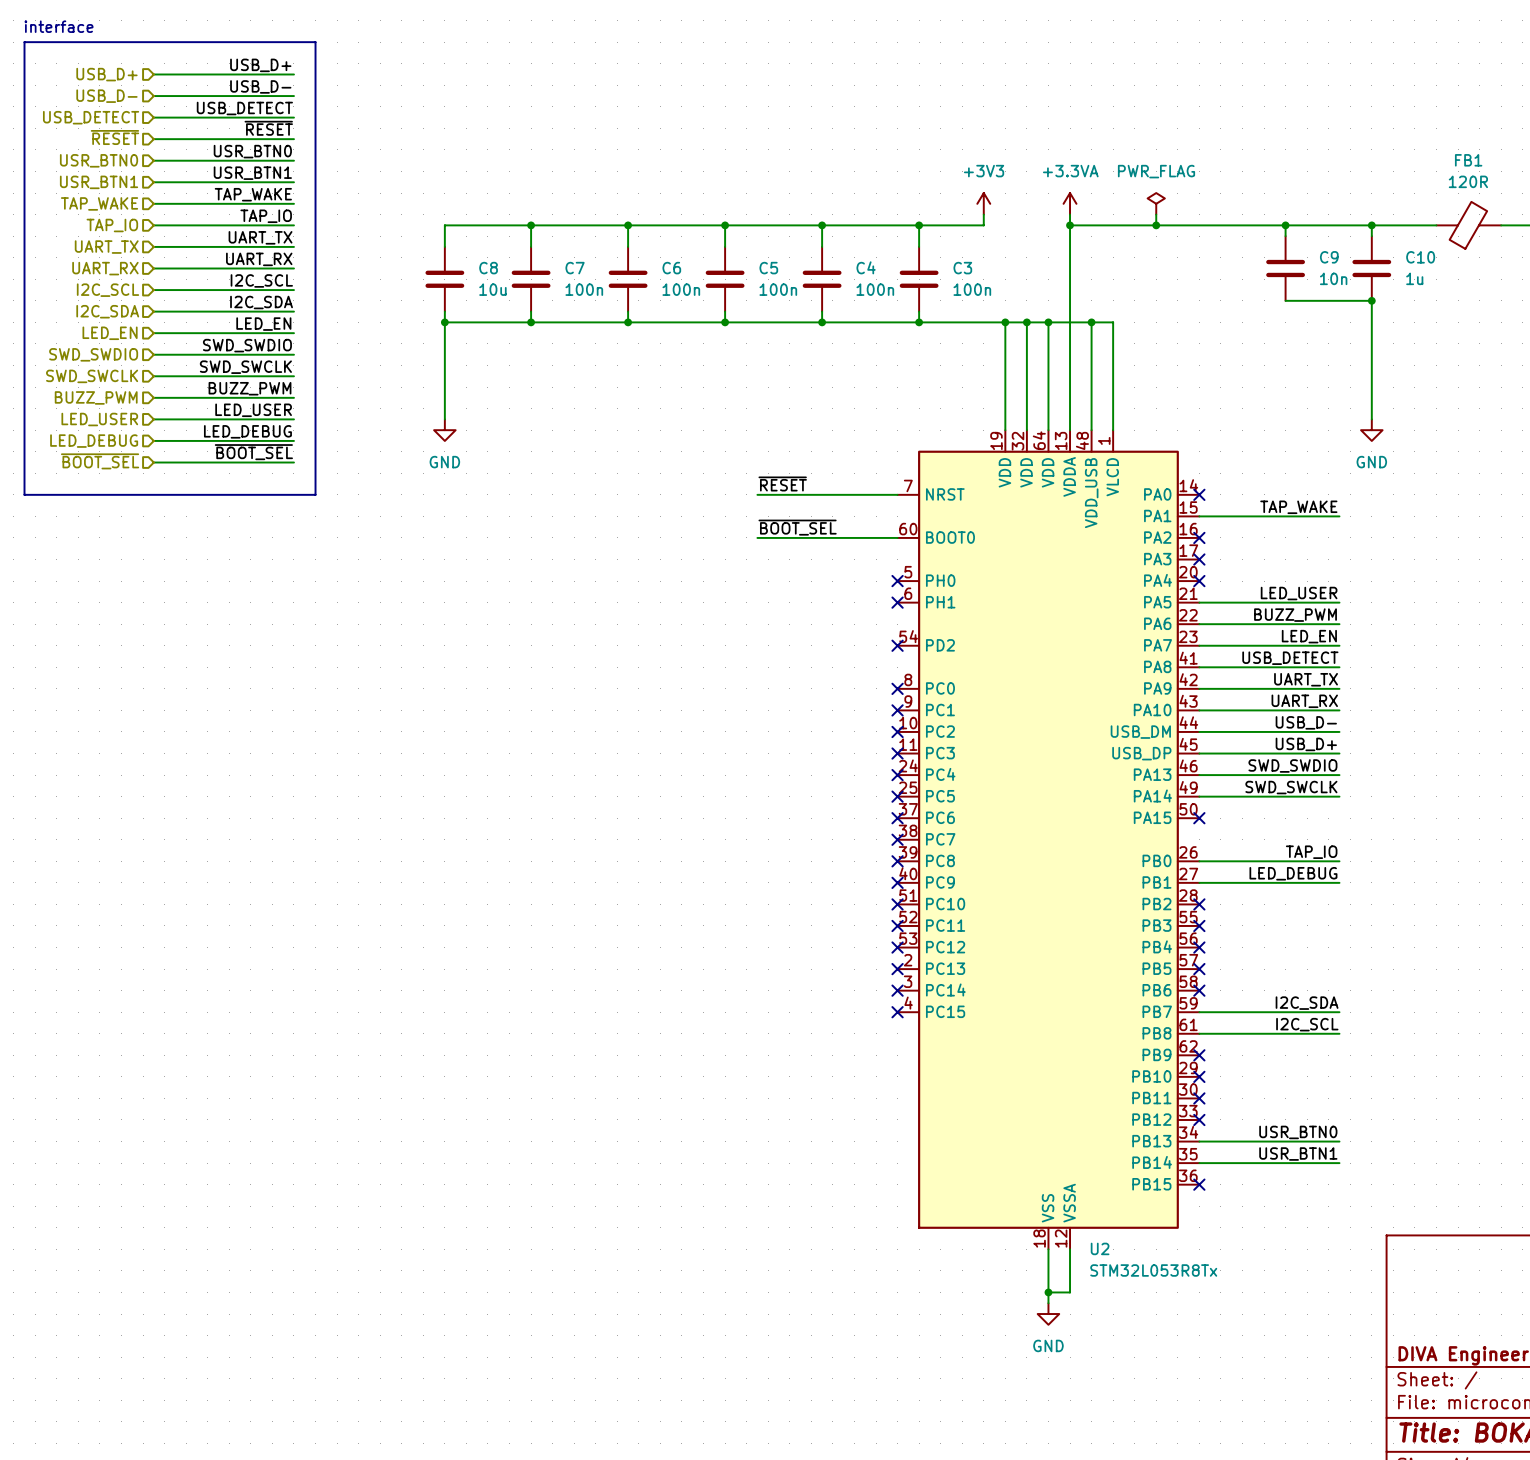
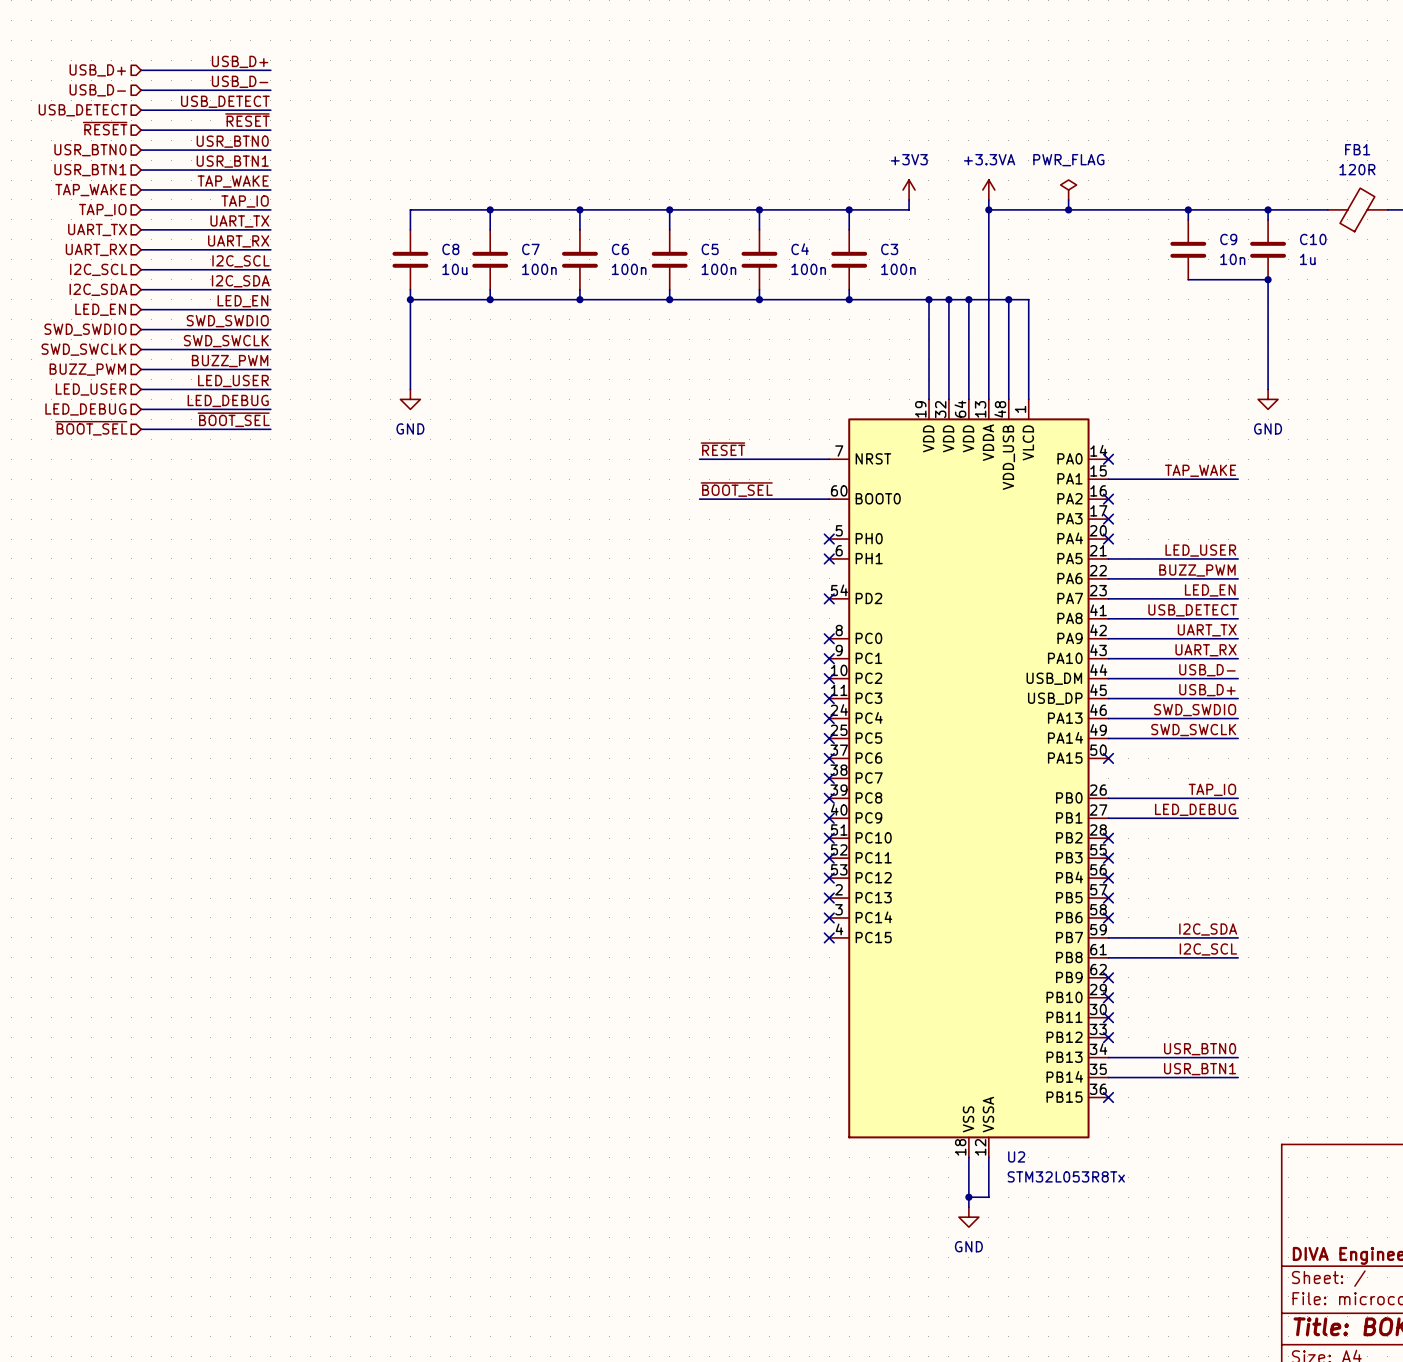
text: interface (58, 26) -> none
line: (24, 42) (315, 42) (315, 494) (24, 494) (24, 42) -> none

